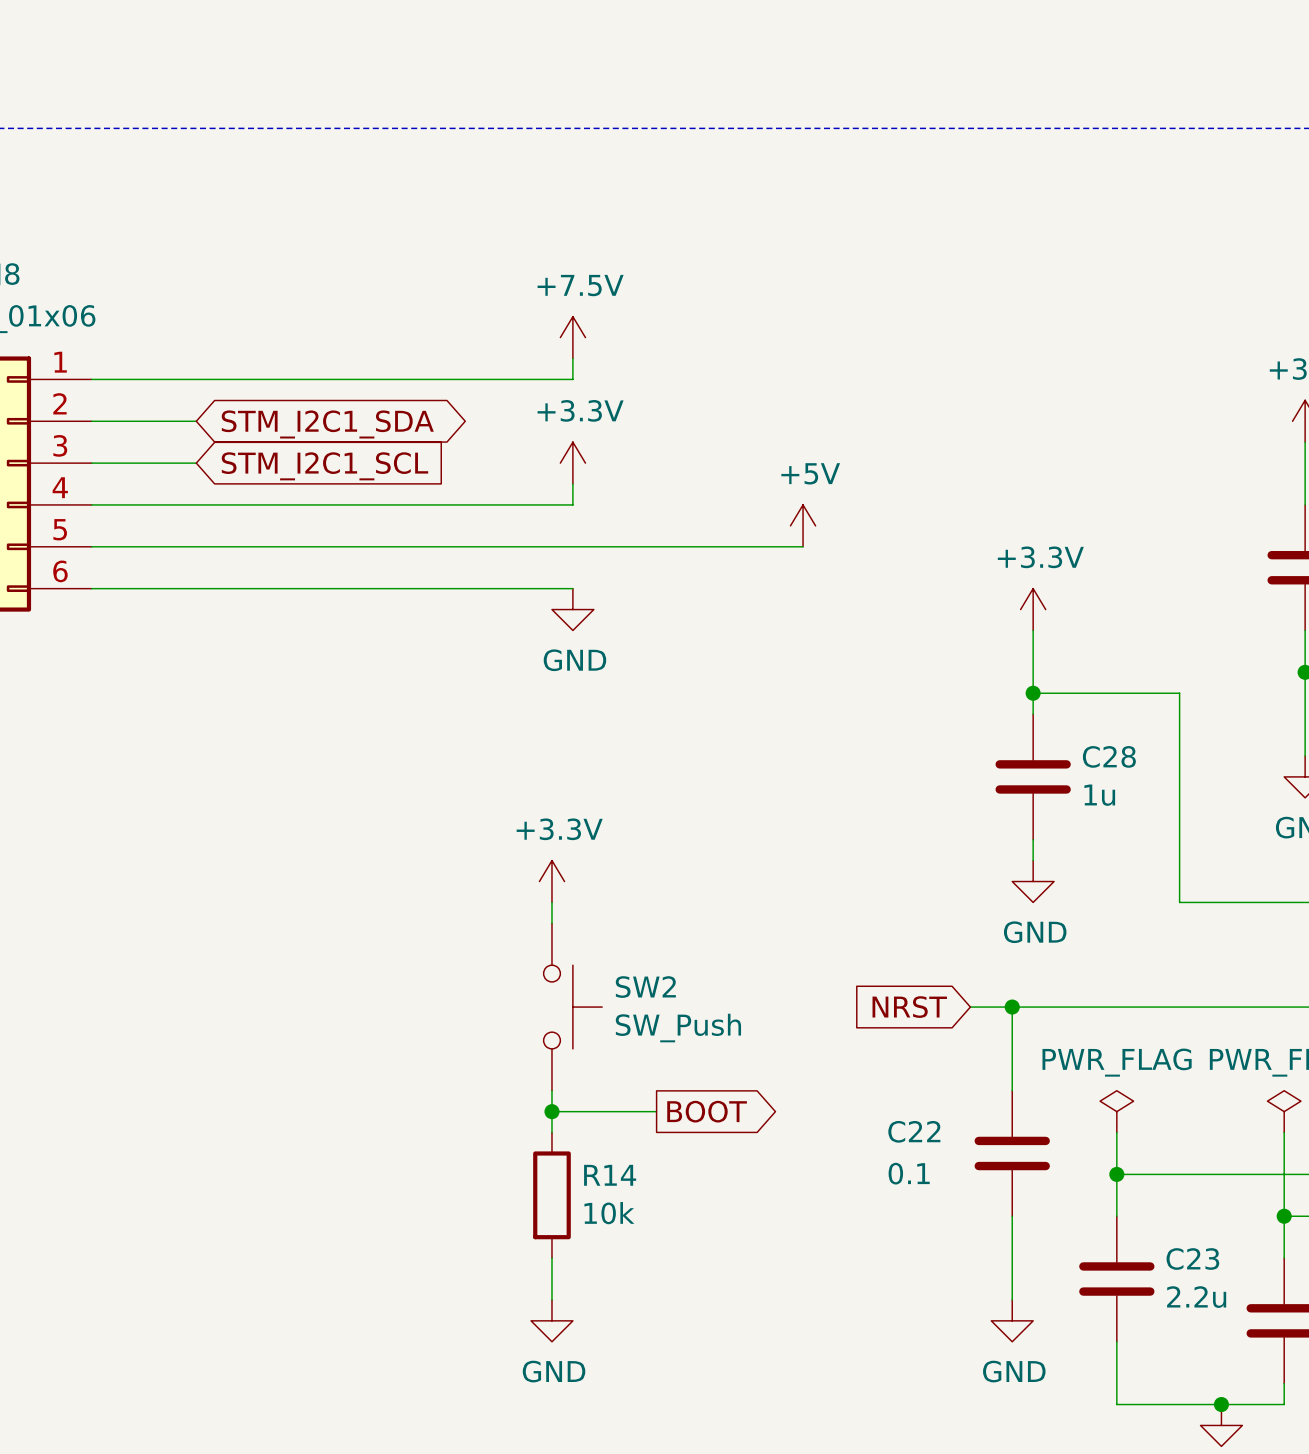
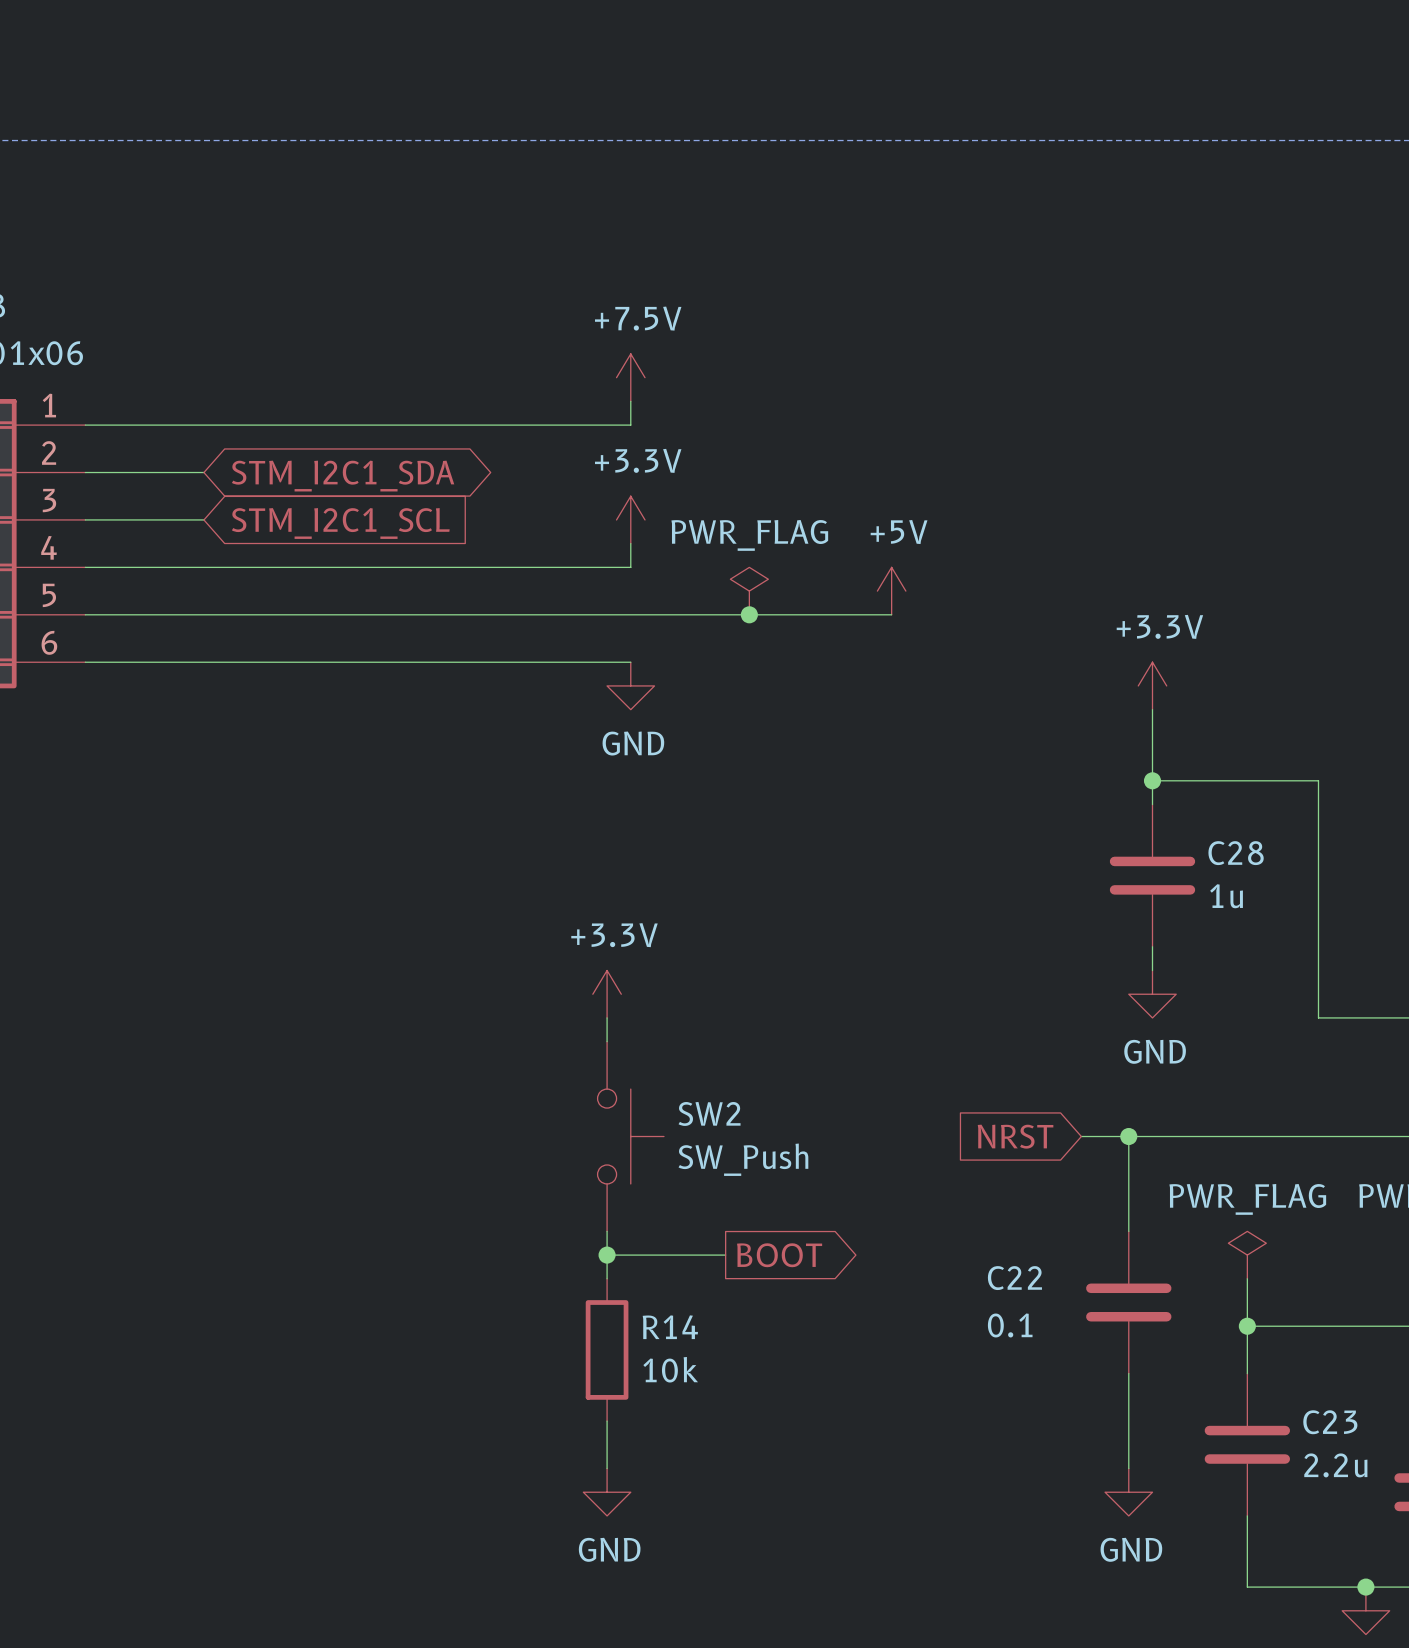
power symbol: none -> PWR_FLAG (749, 591)
junction: none -> (749, 614)

